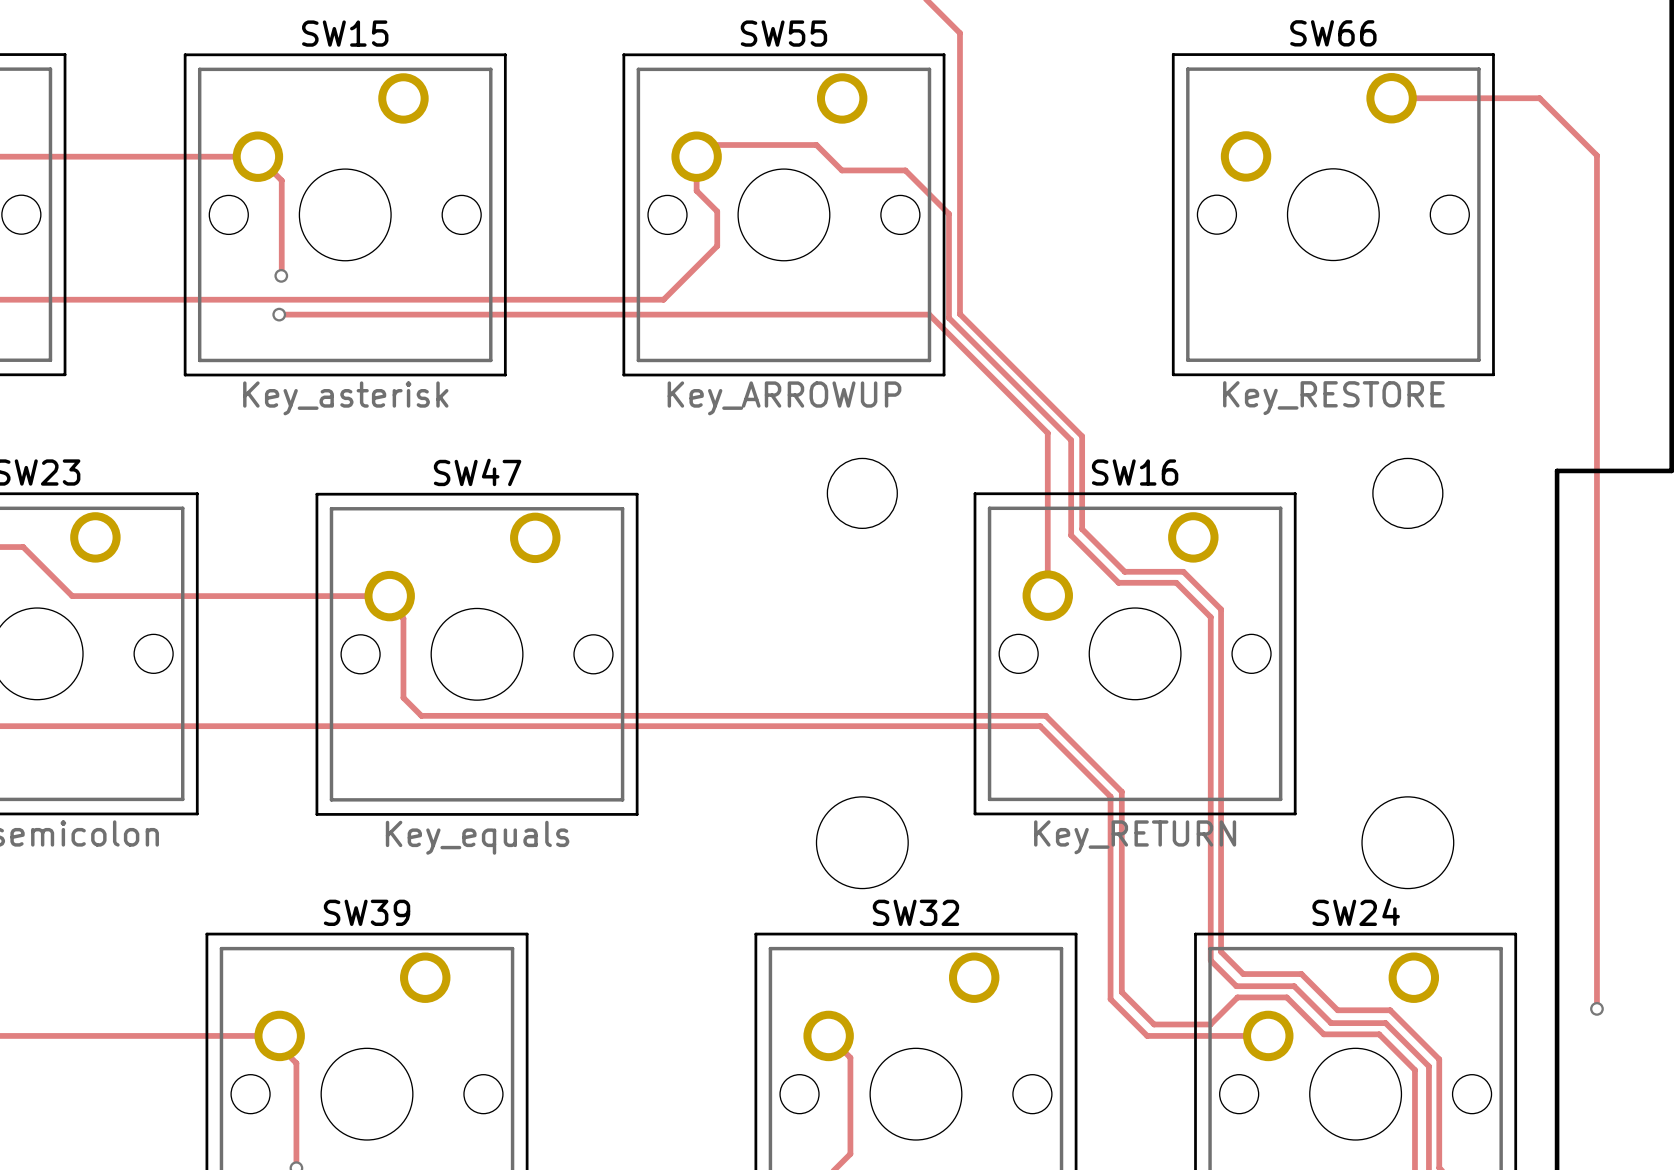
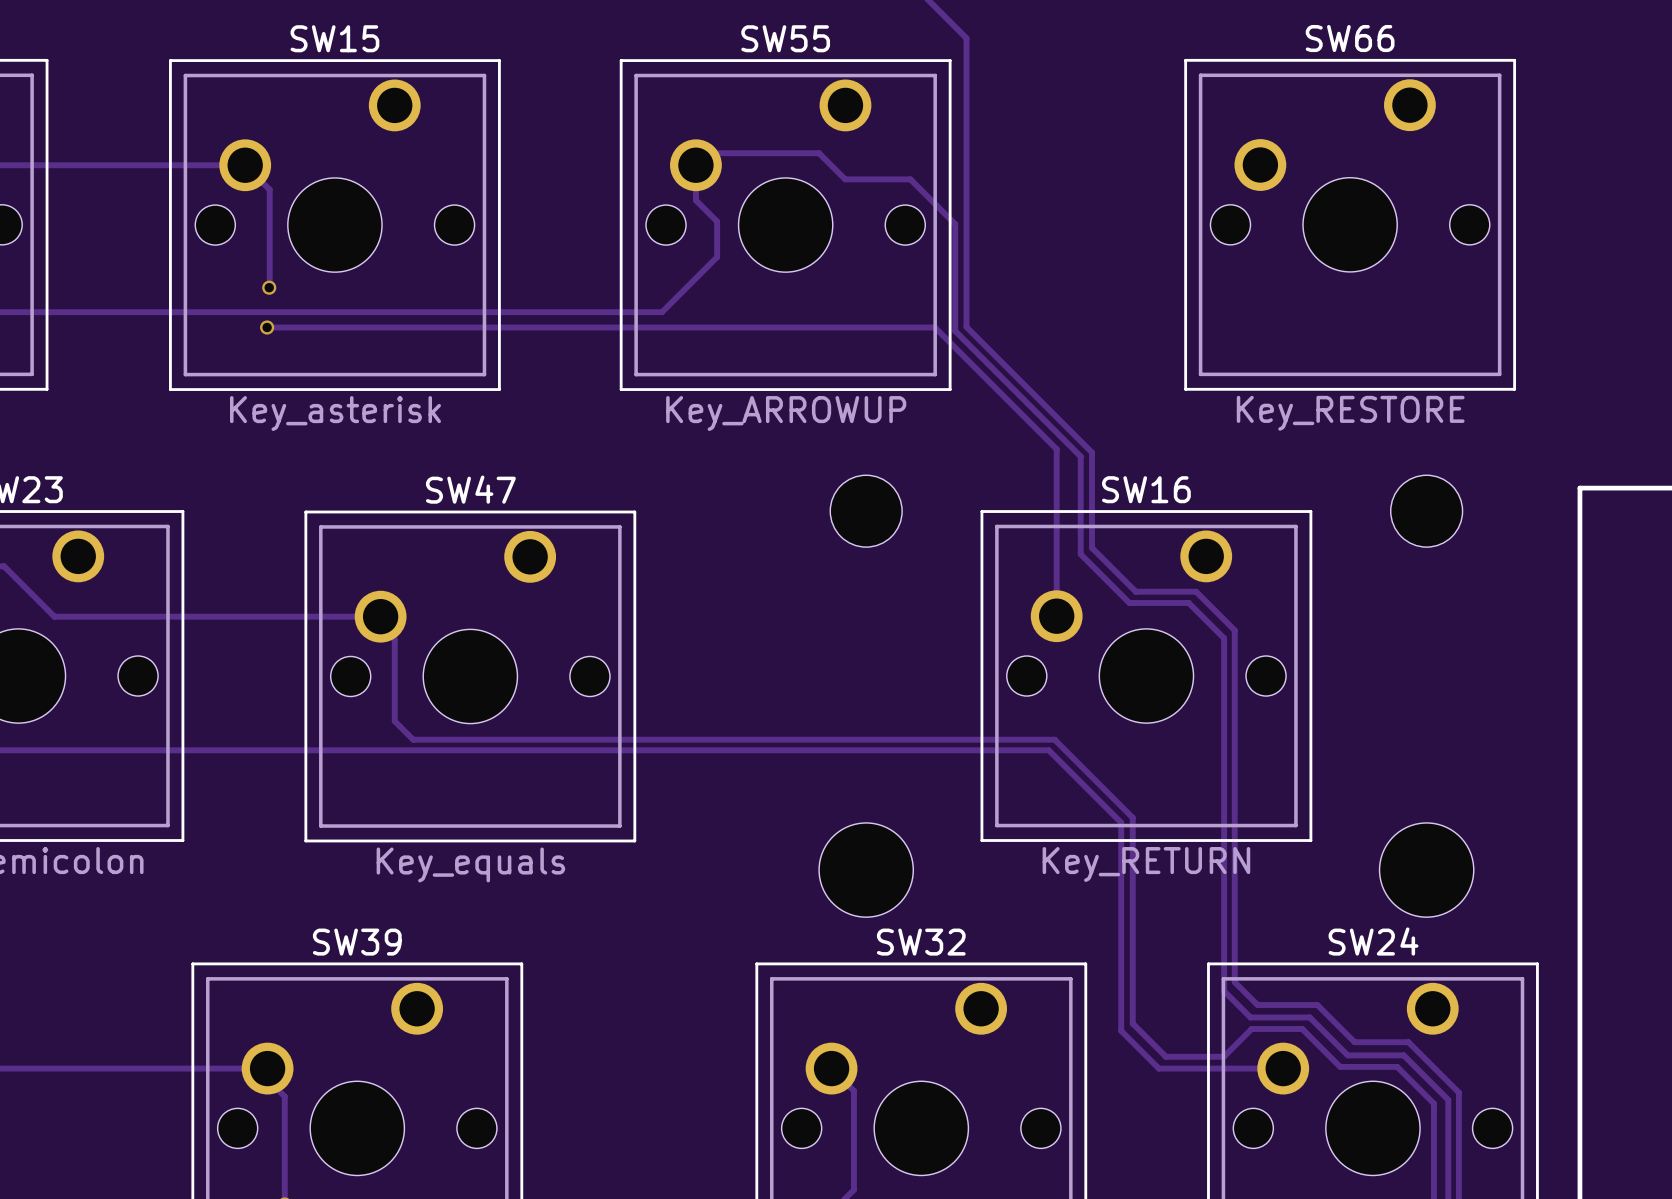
track: (1391, 98) (1539, 98) (1596, 155) (1596, 1008) -> none
via: (1596, 1008) -> none

